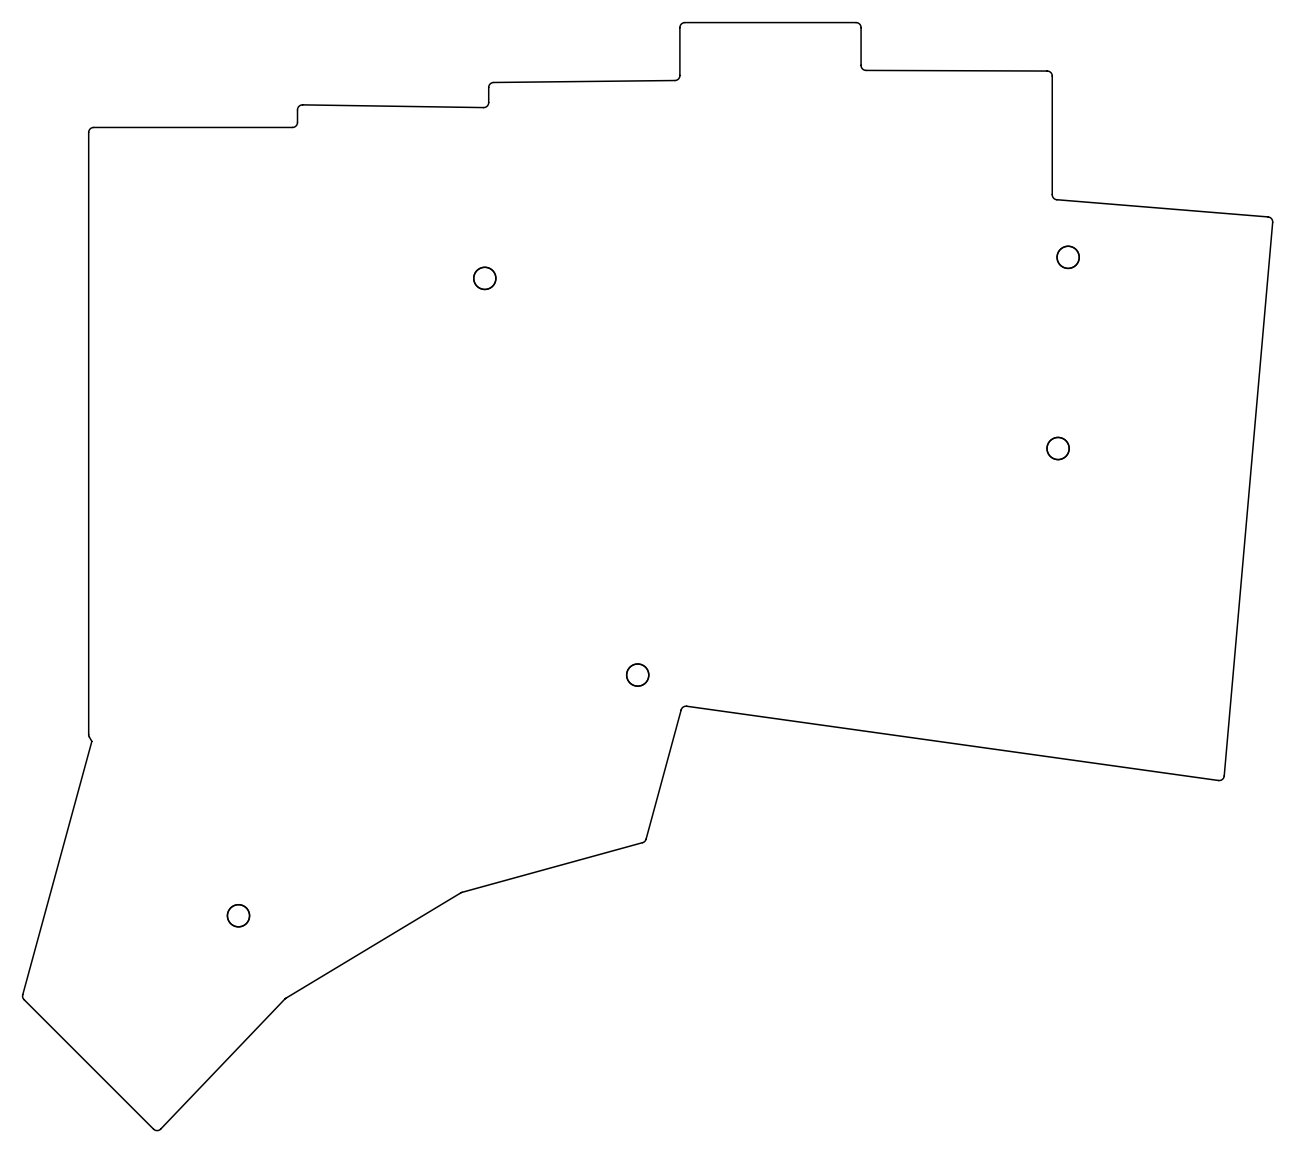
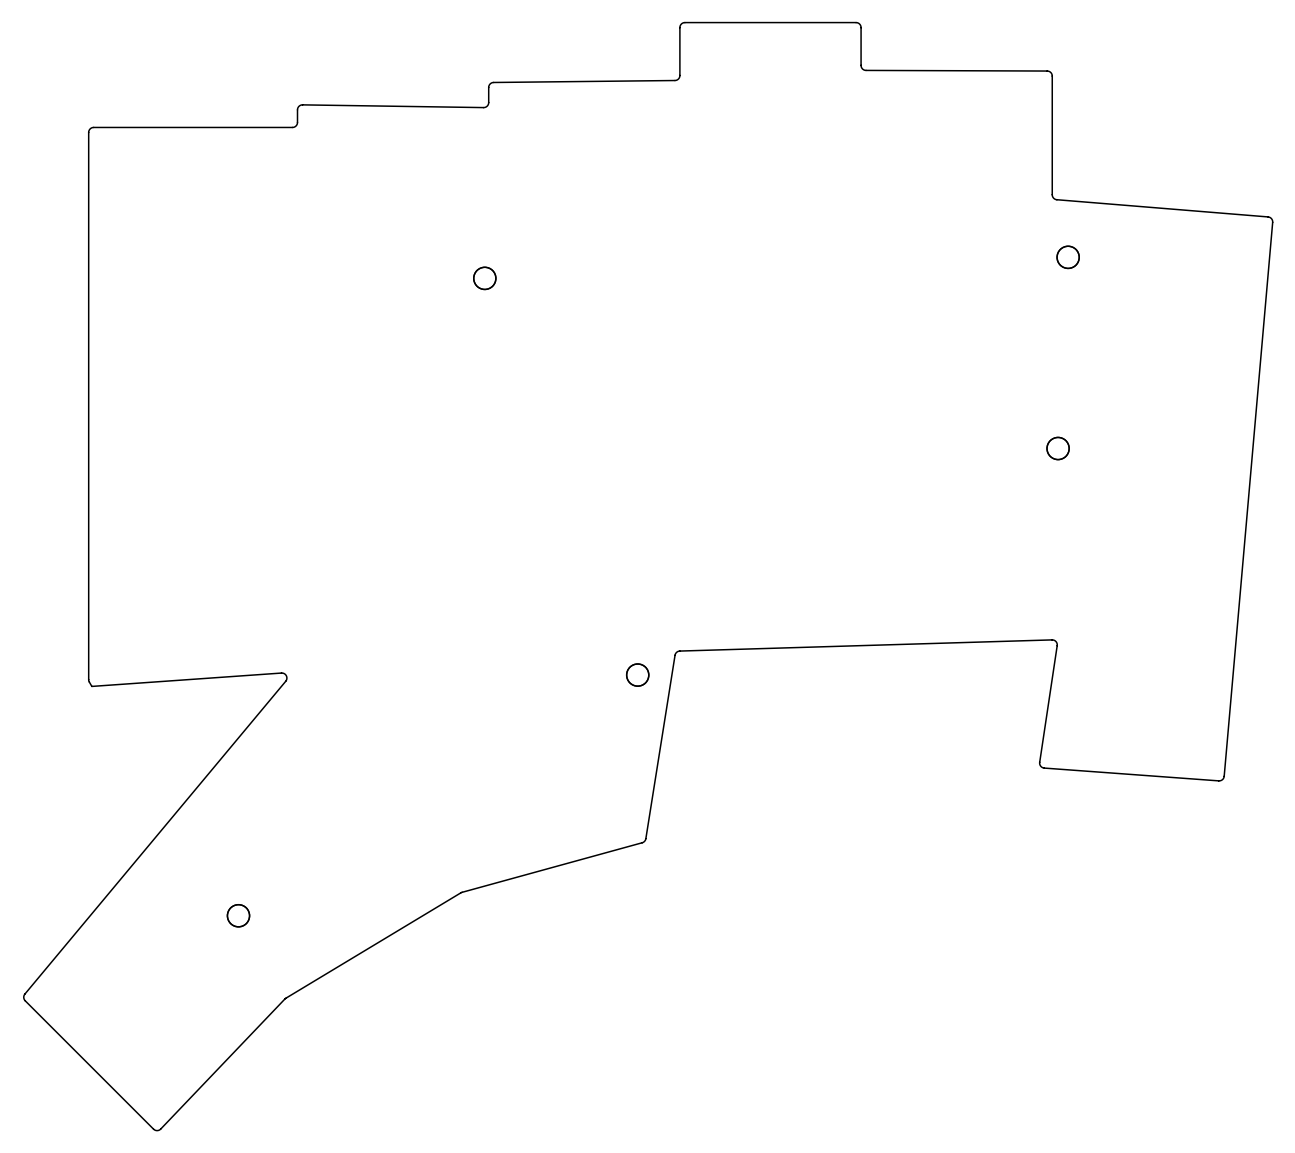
board edge: (88, 679) (88, 734) (91, 741) (22, 994) (25, 1000) -> (88, 679) (91, 686) (281, 673) (285, 674) (286, 678) (24, 994) (25, 1000)
board edge: (1224, 775) (1222, 779) (1218, 780) (685, 706) (681, 709) (646, 839) (642, 842) -> (1224, 775) (1222, 779) (1218, 780) (1041, 767) (1039, 762) (1057, 645) (1053, 640) (679, 651) (675, 655) (645, 838) (642, 842)

